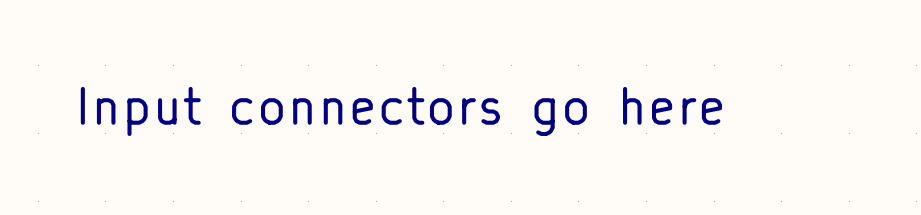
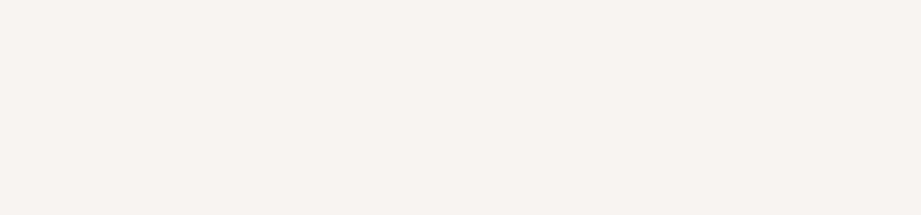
text: Input connectors go here (401, 111) -> none

